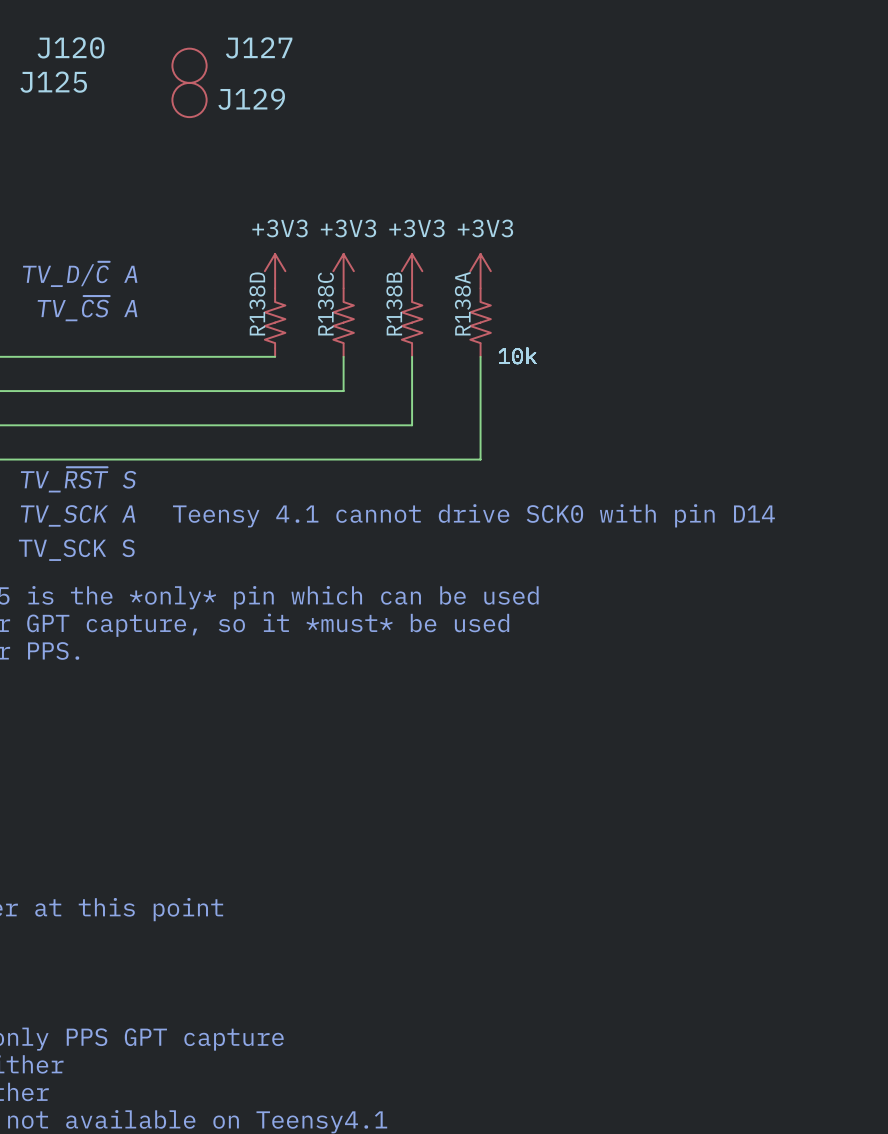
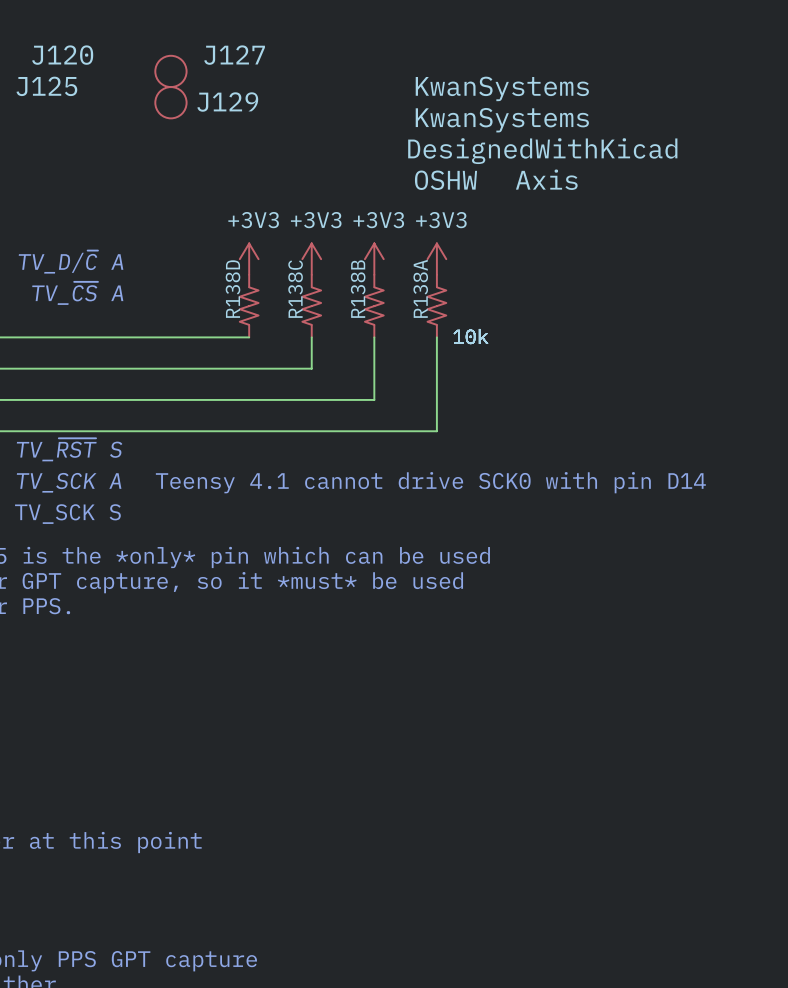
part: none -> KwanSystems (502, 88)
part: none -> KwanSystems (502, 120)
part: none -> DesignedWithKicad (542, 151)
part: none -> OSHW (445, 180)
part: none -> Axis (546, 179)

